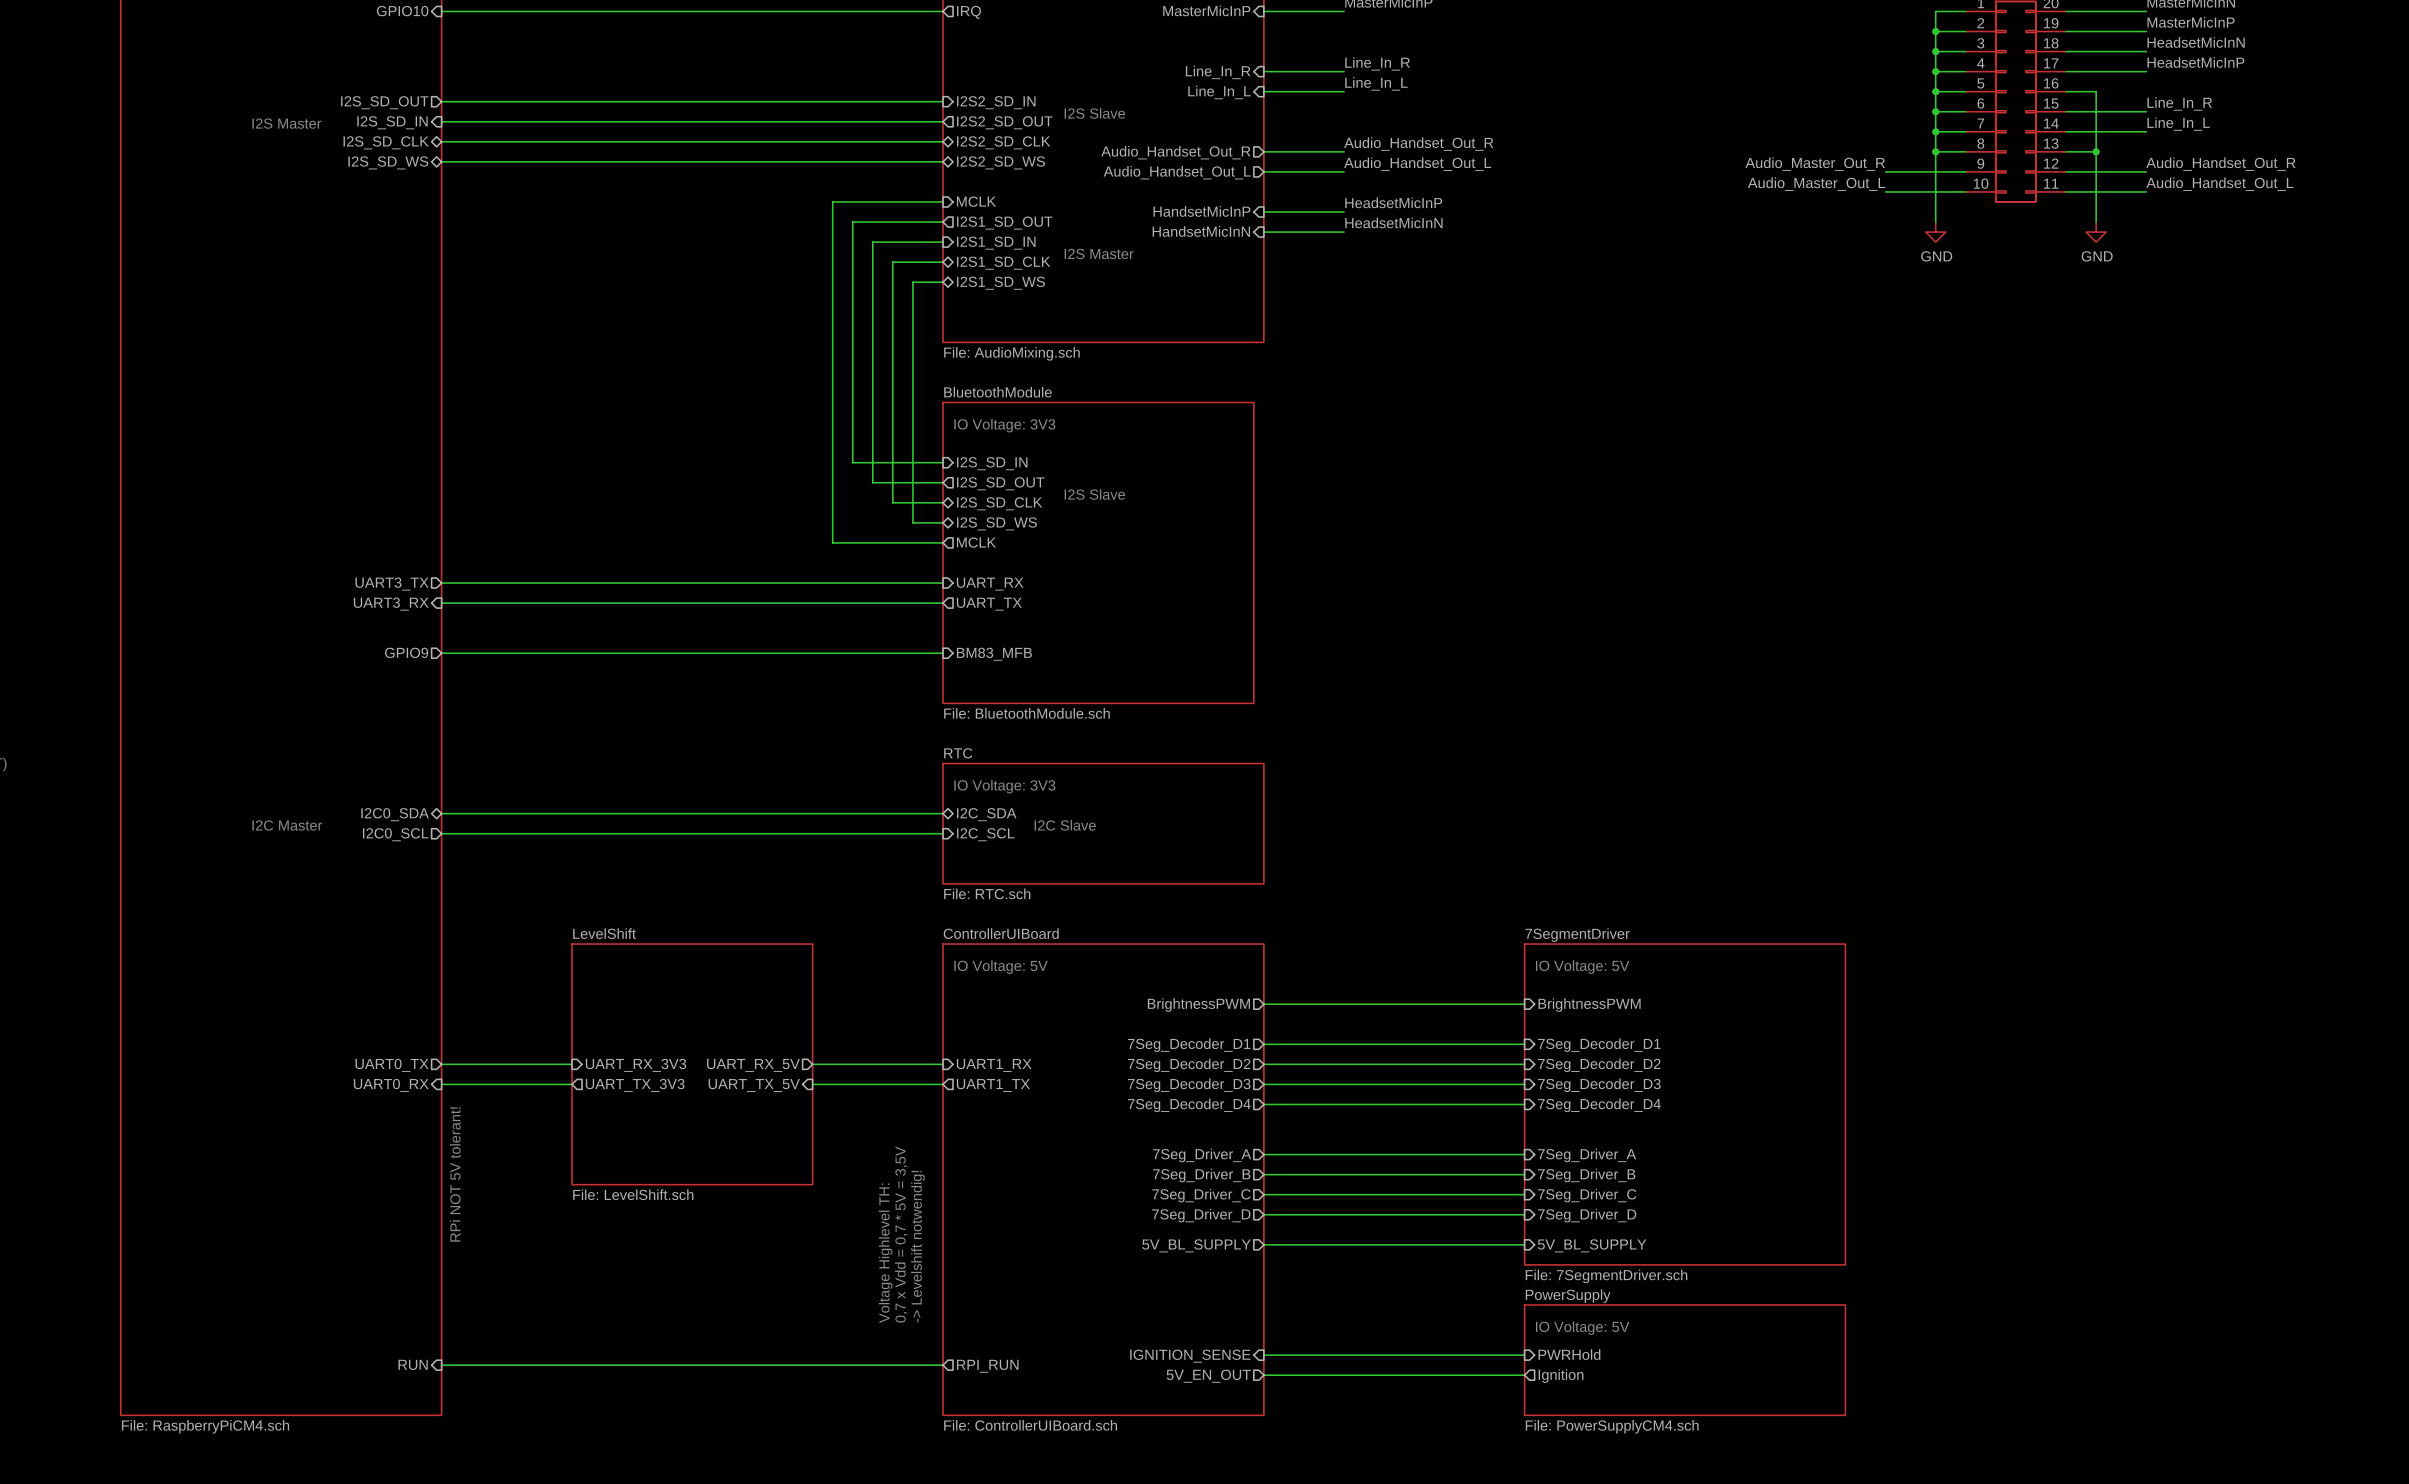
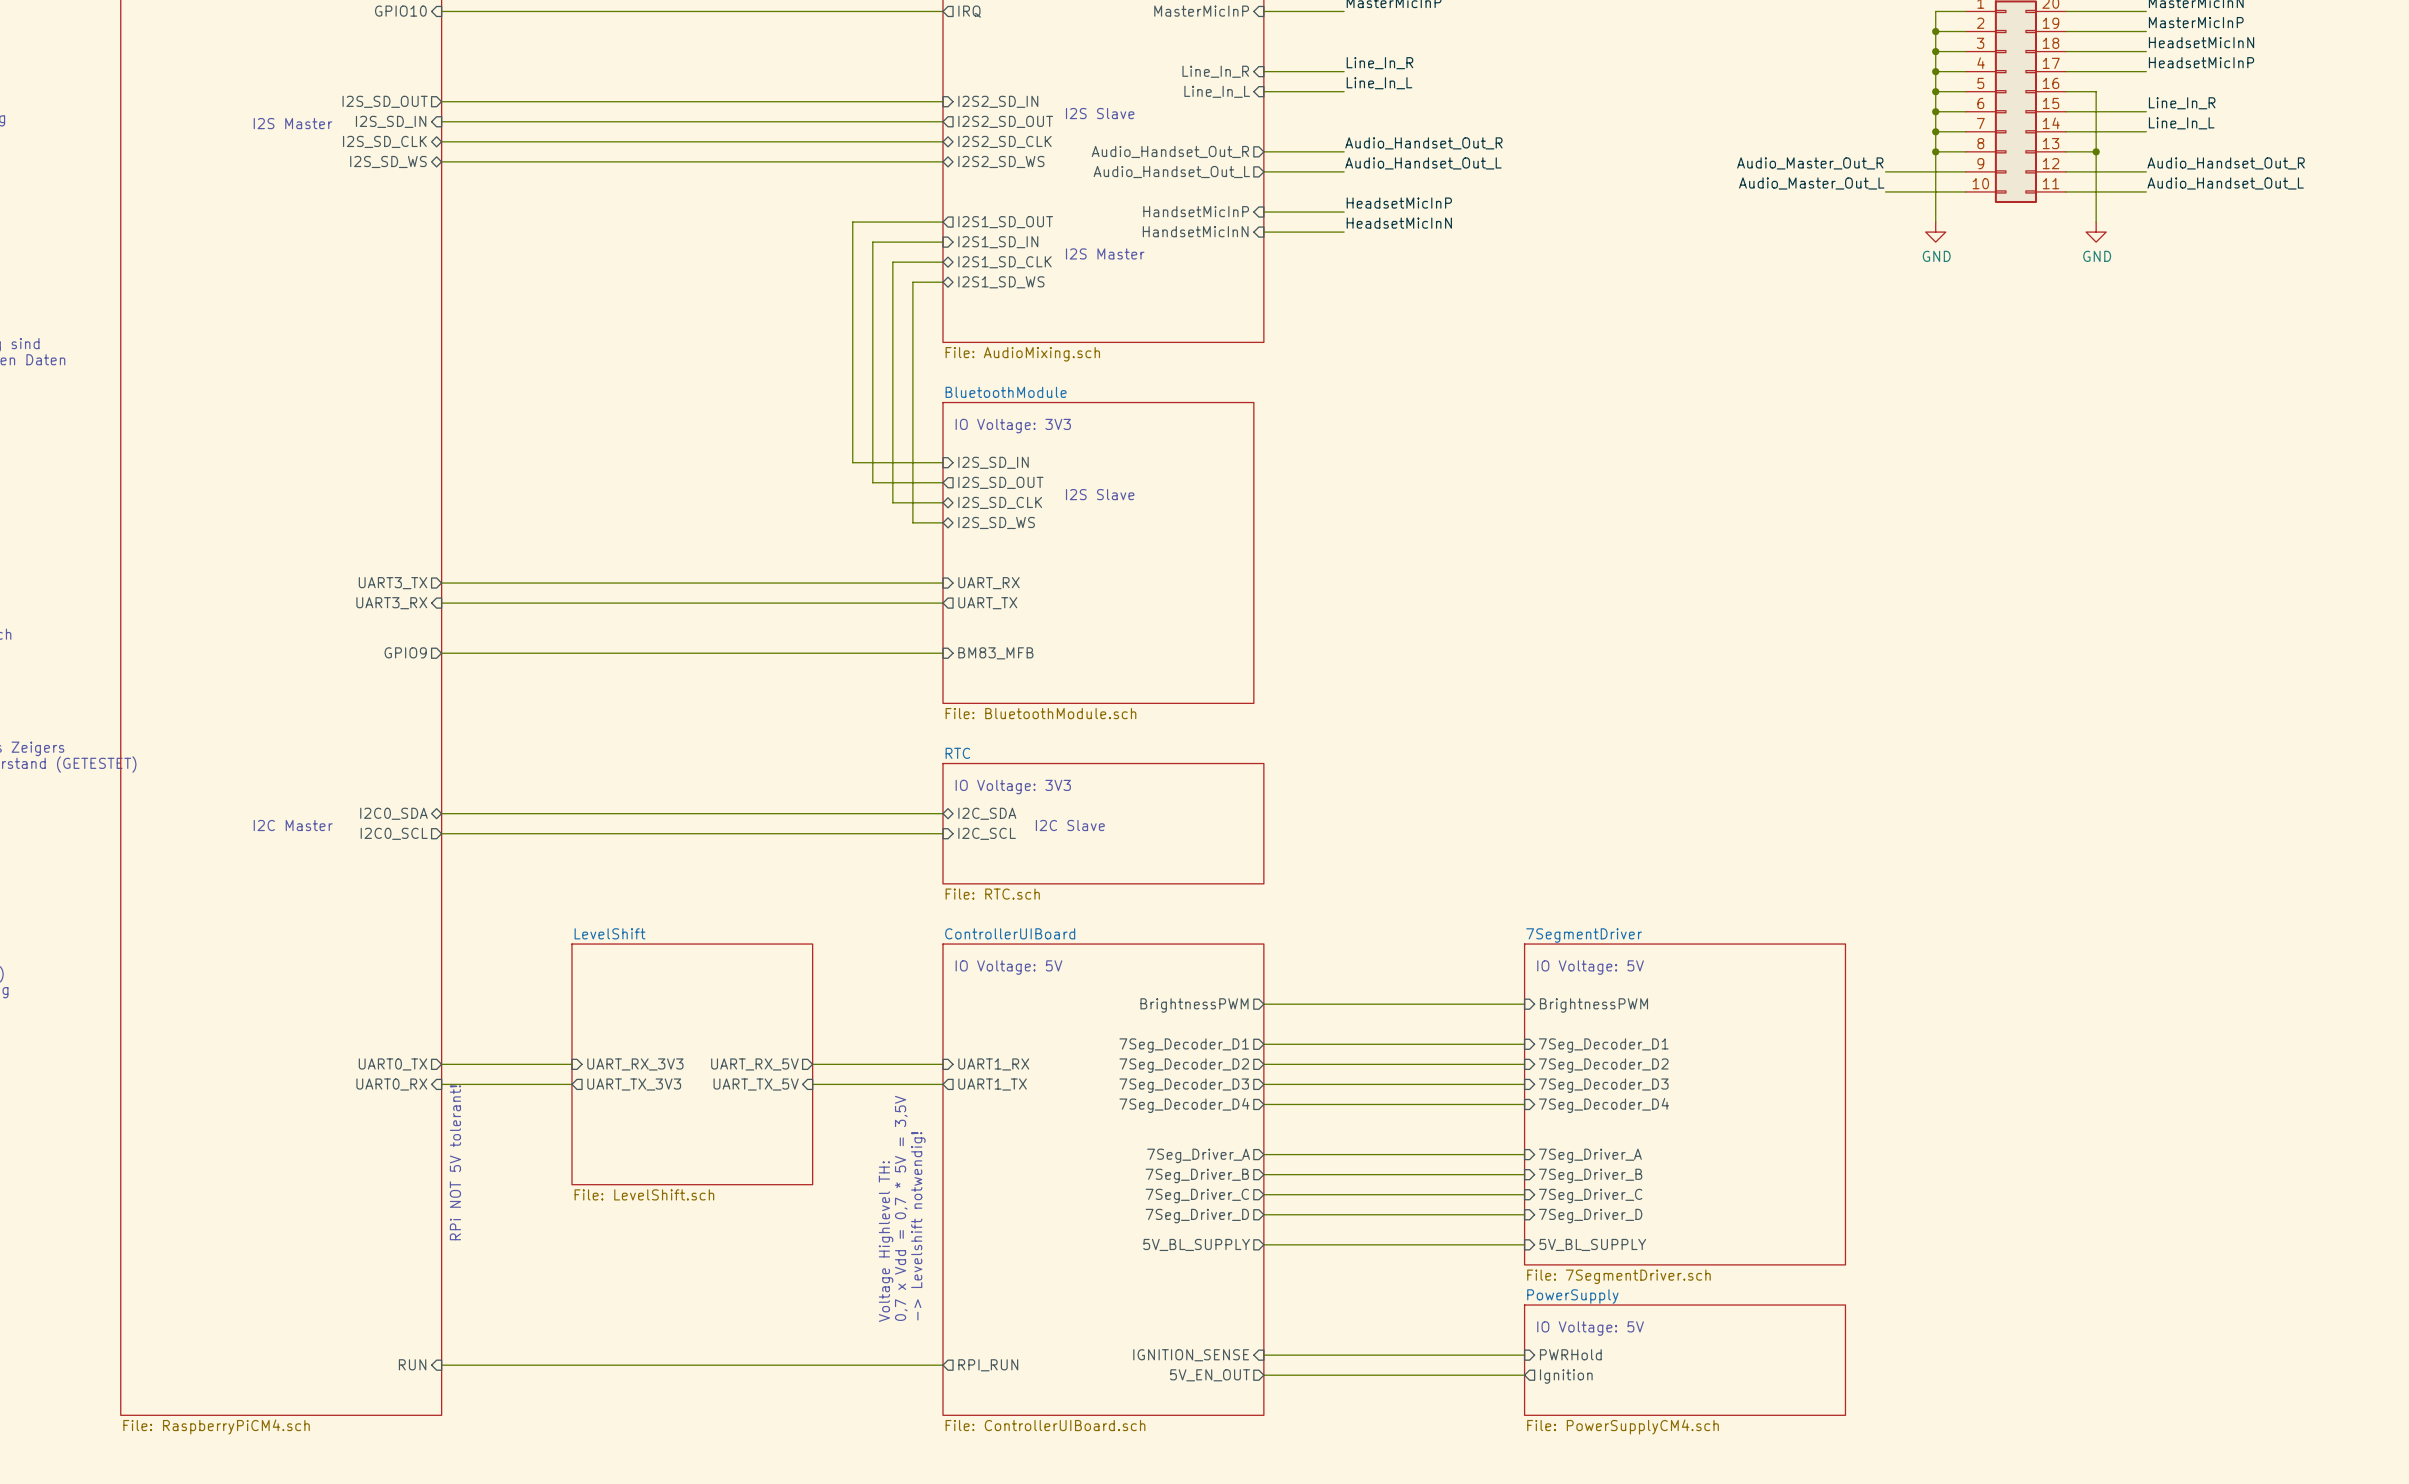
wire: (942, 201) (832, 201) (832, 542) (942, 542) -> none
sheet pin: MCLK (976, 201) -> none
sheet pin: MCLK (976, 542) -> none

